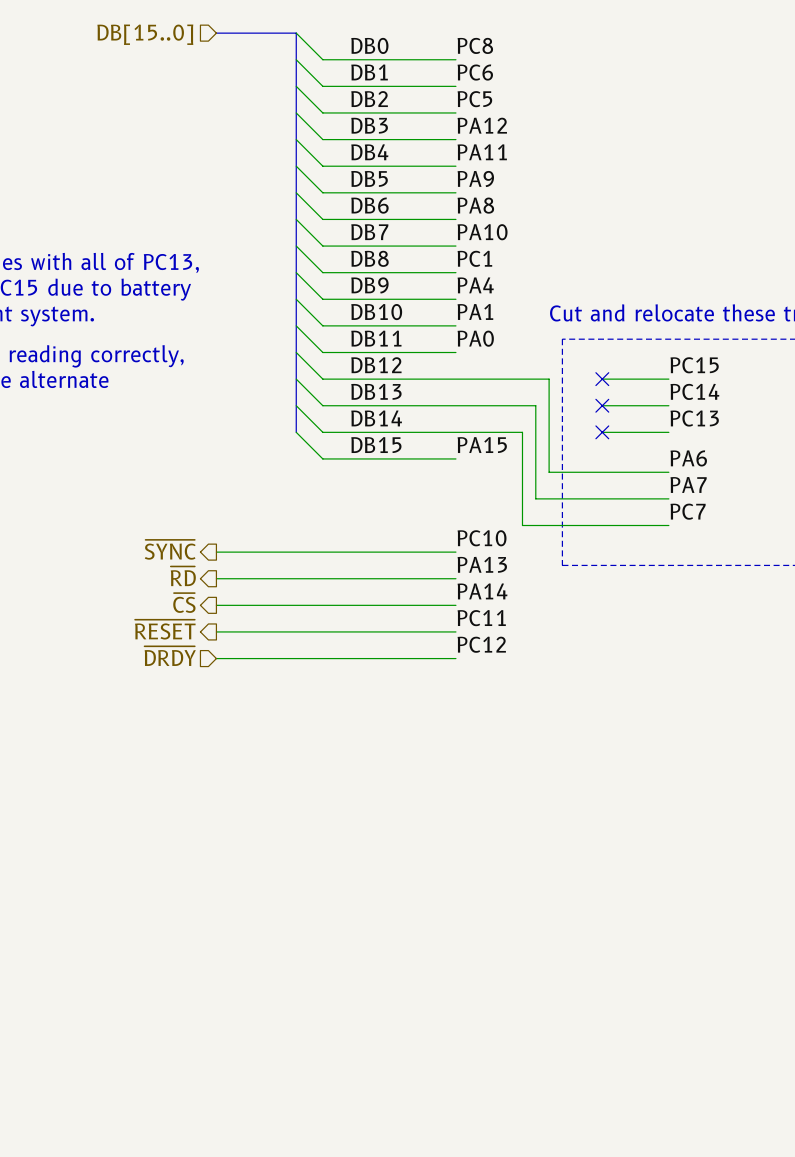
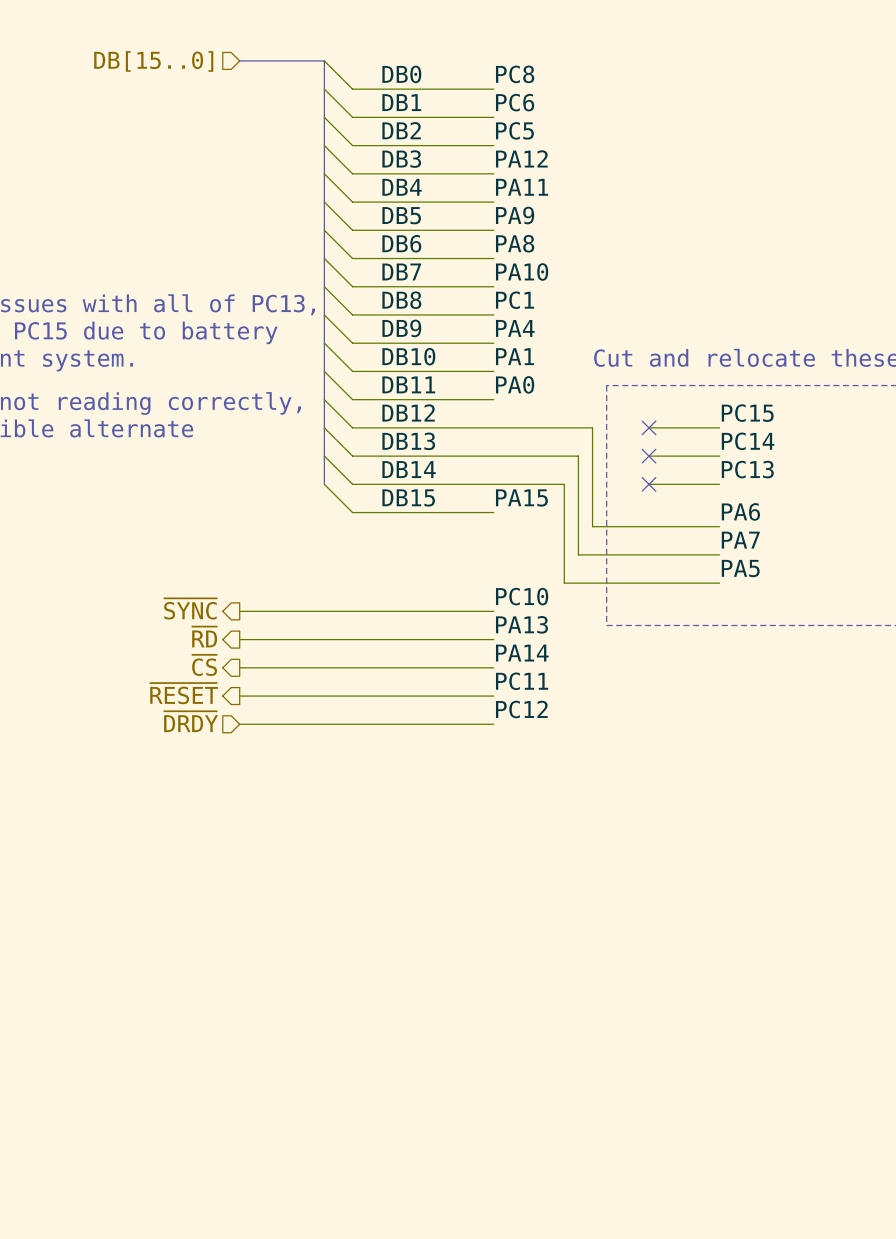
label: PC7 (688, 511) -> PA5 (740, 568)

